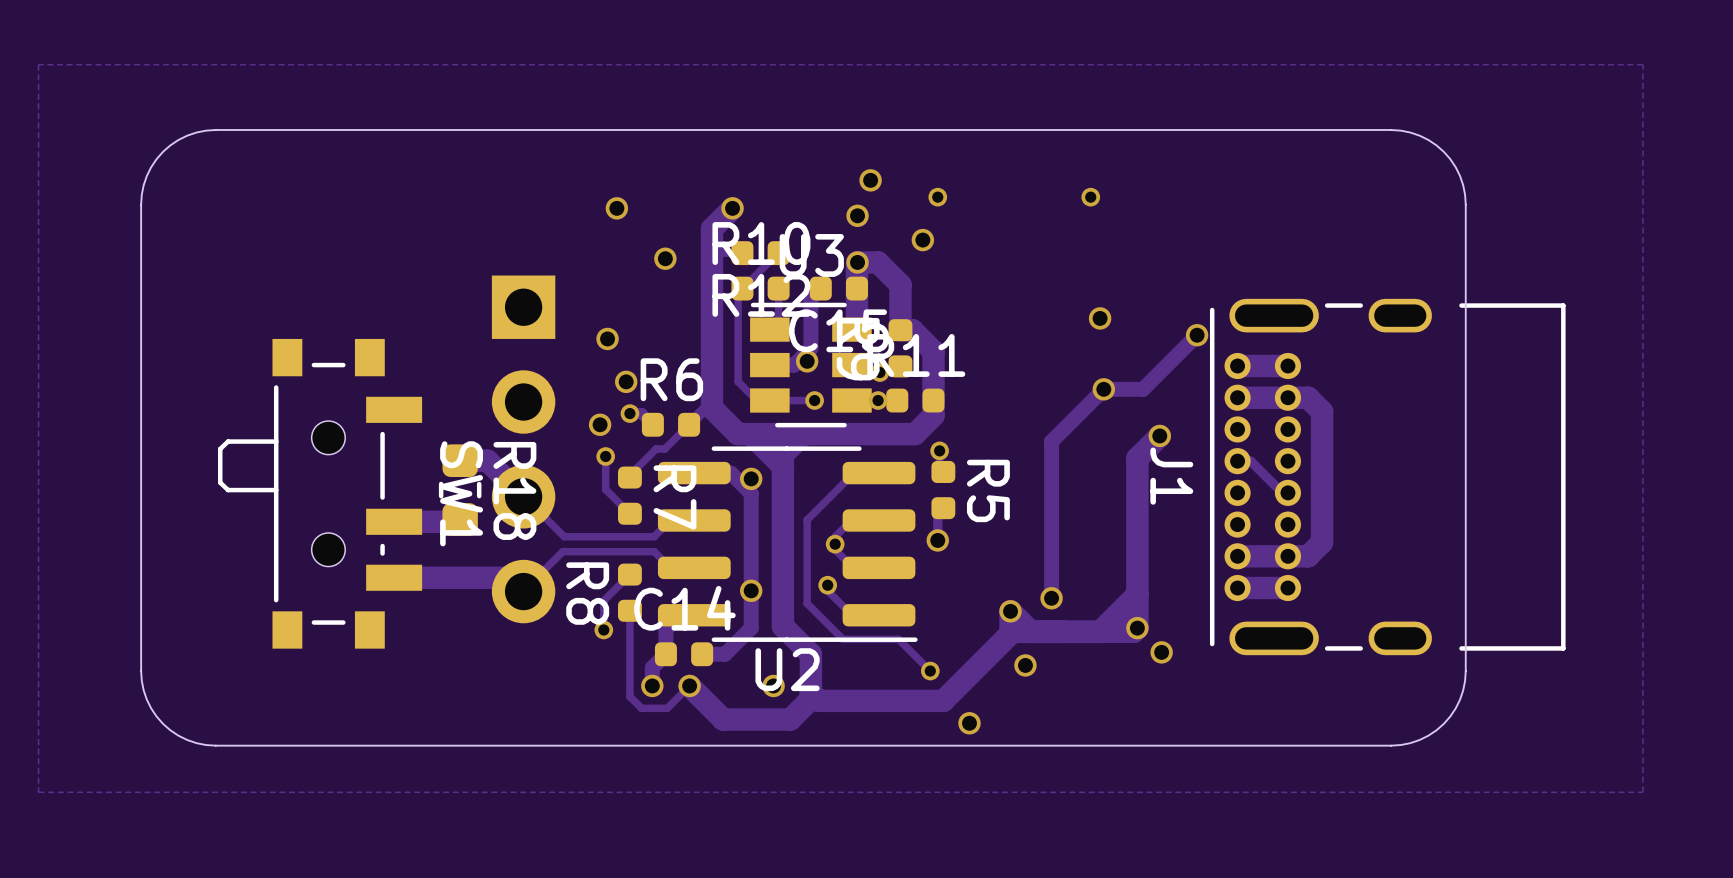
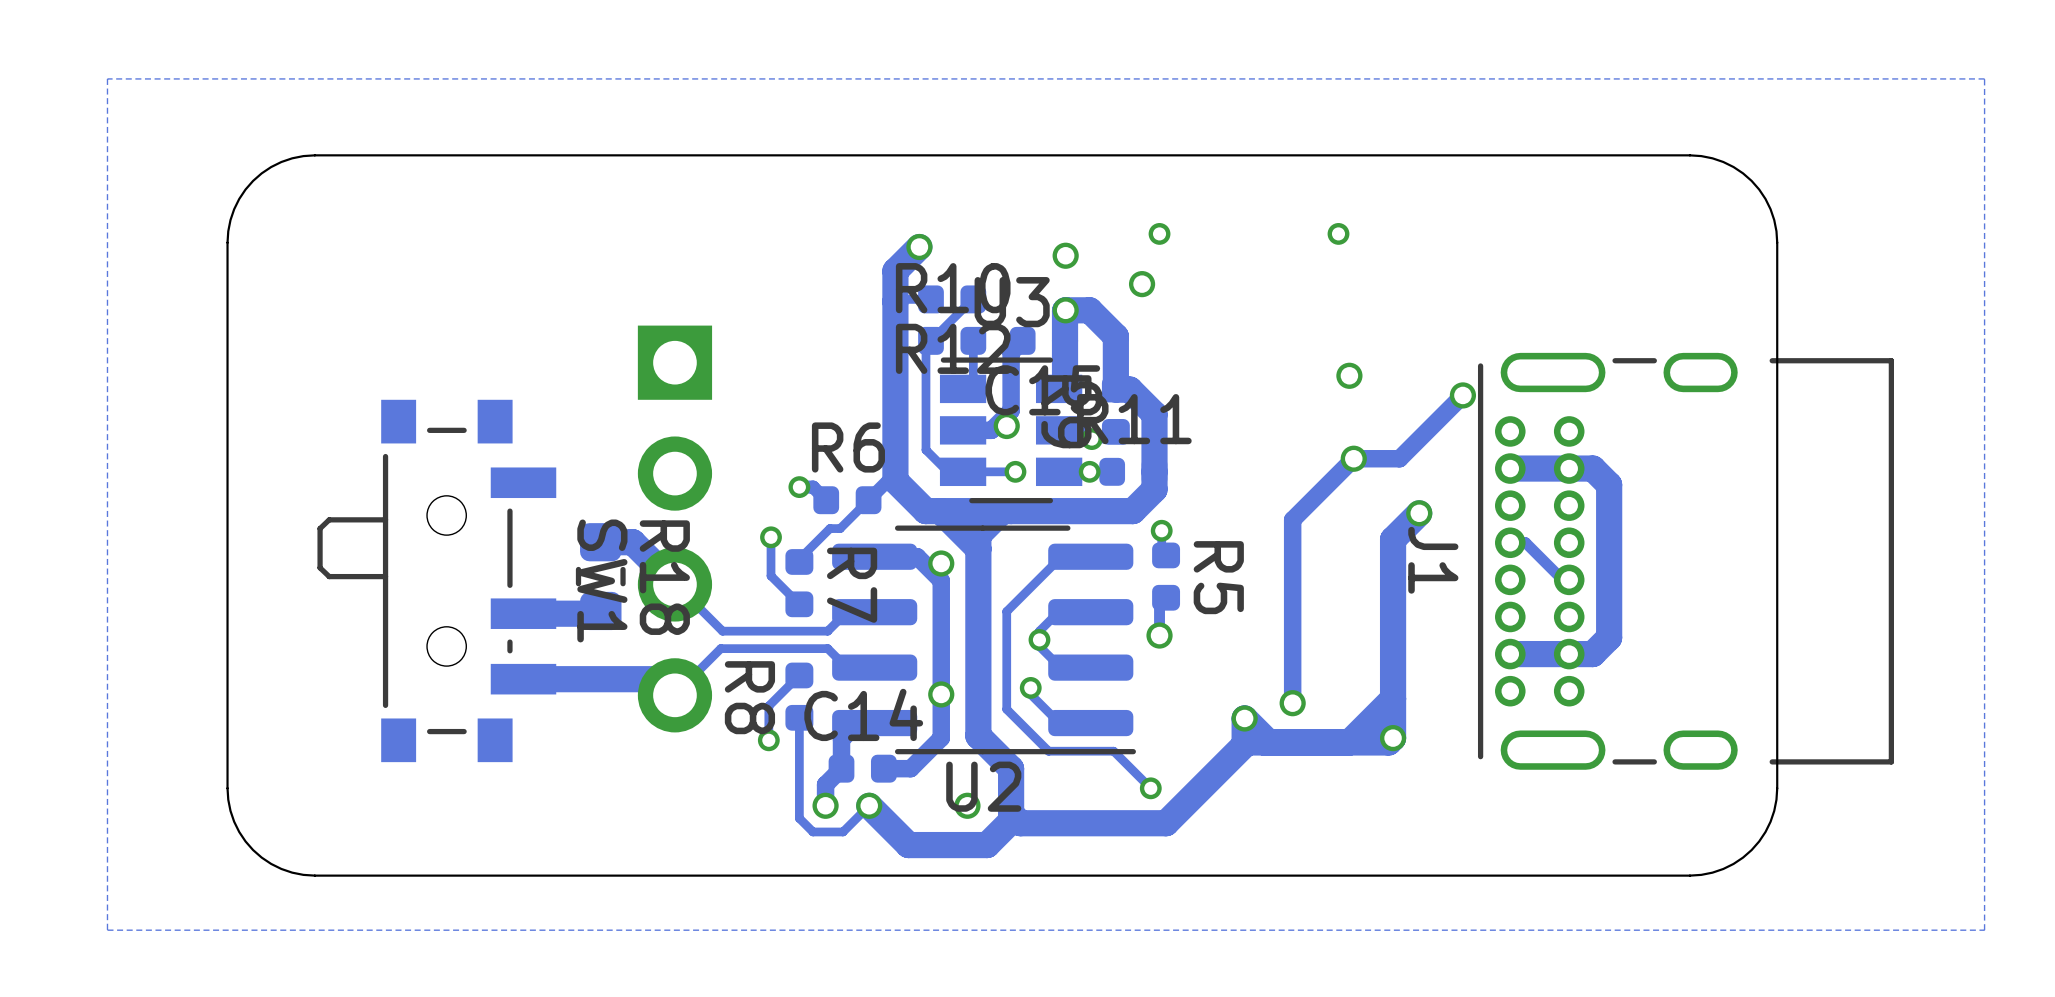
via: (870, 180) -> none
via: (616, 208) -> none
via: (665, 258) -> none
via: (607, 338) -> none
track: (1287, 366) (1237, 366) -> none
via: (626, 381) -> none
via: (600, 424) -> none
track: (1287, 588) (1237, 588) -> none
via: (1161, 652) -> none
via: (1025, 665) -> none
via: (969, 723) -> none

